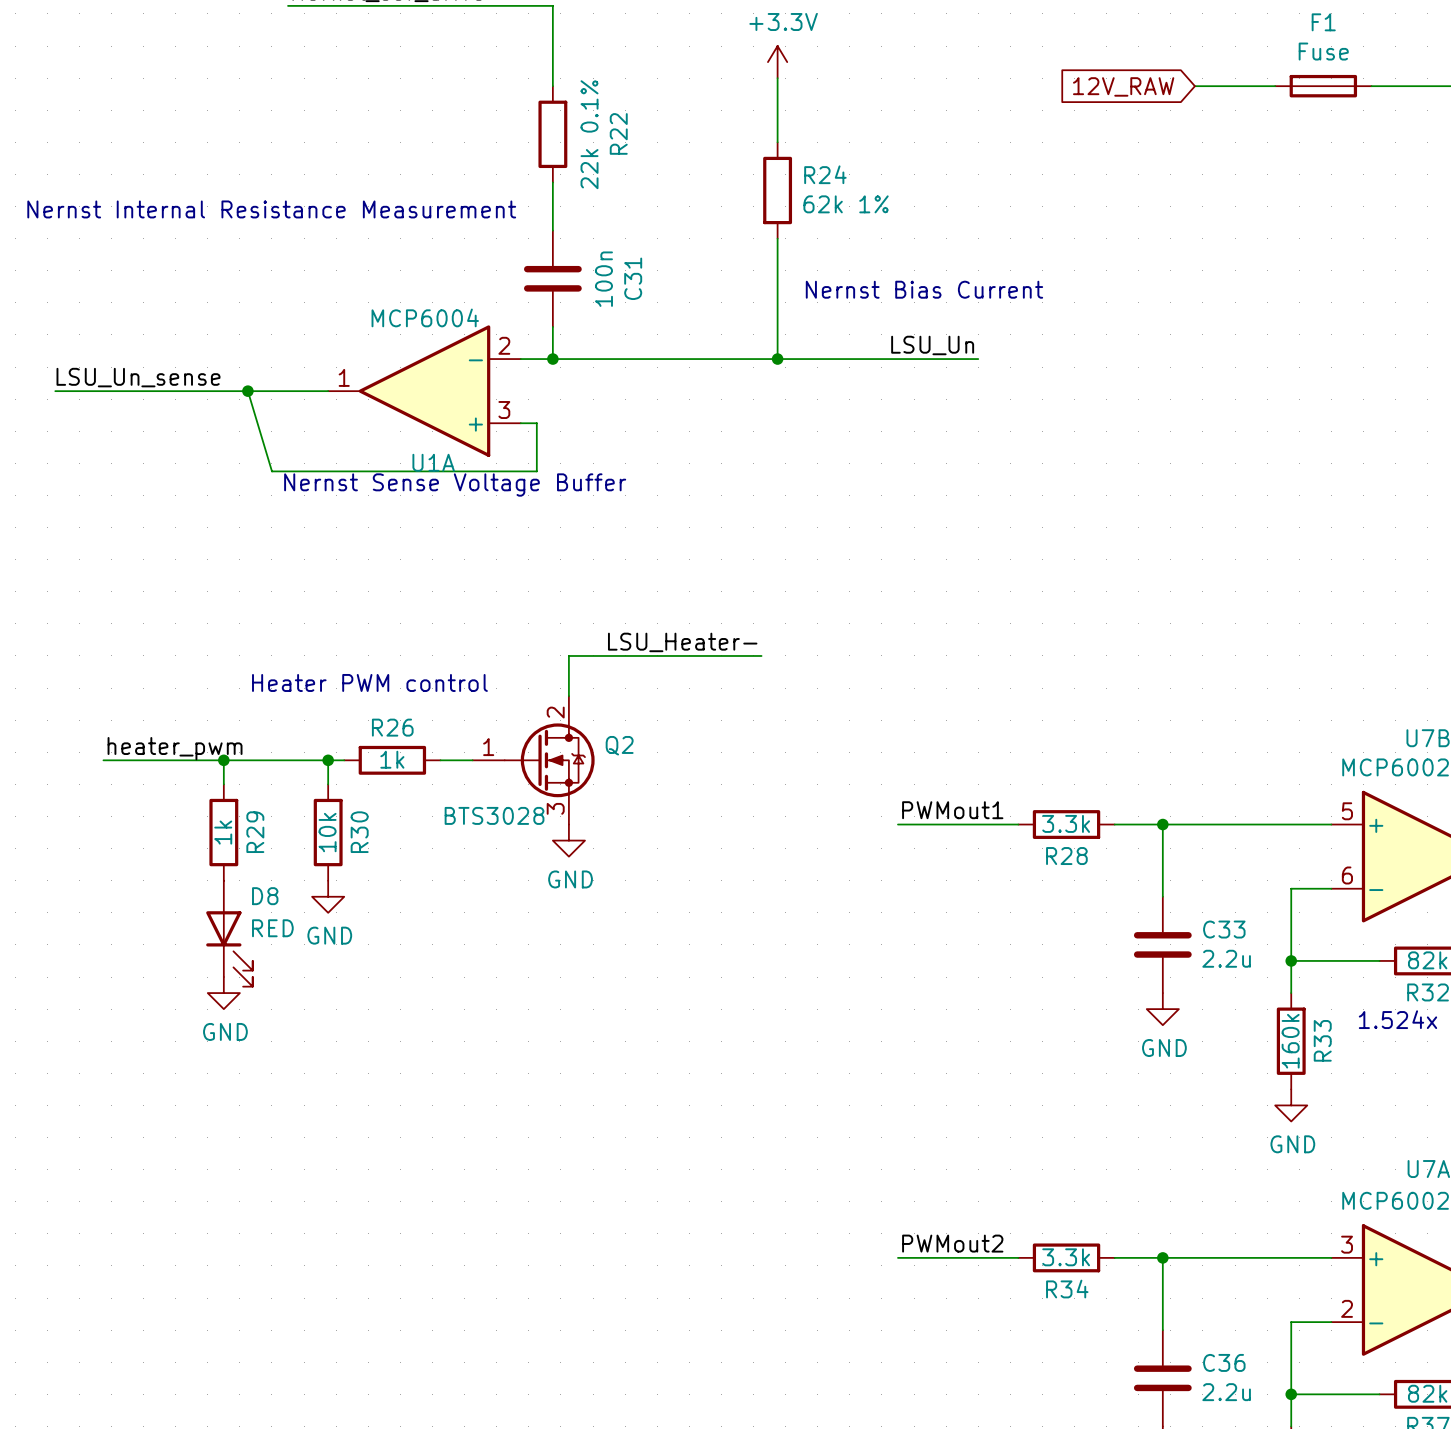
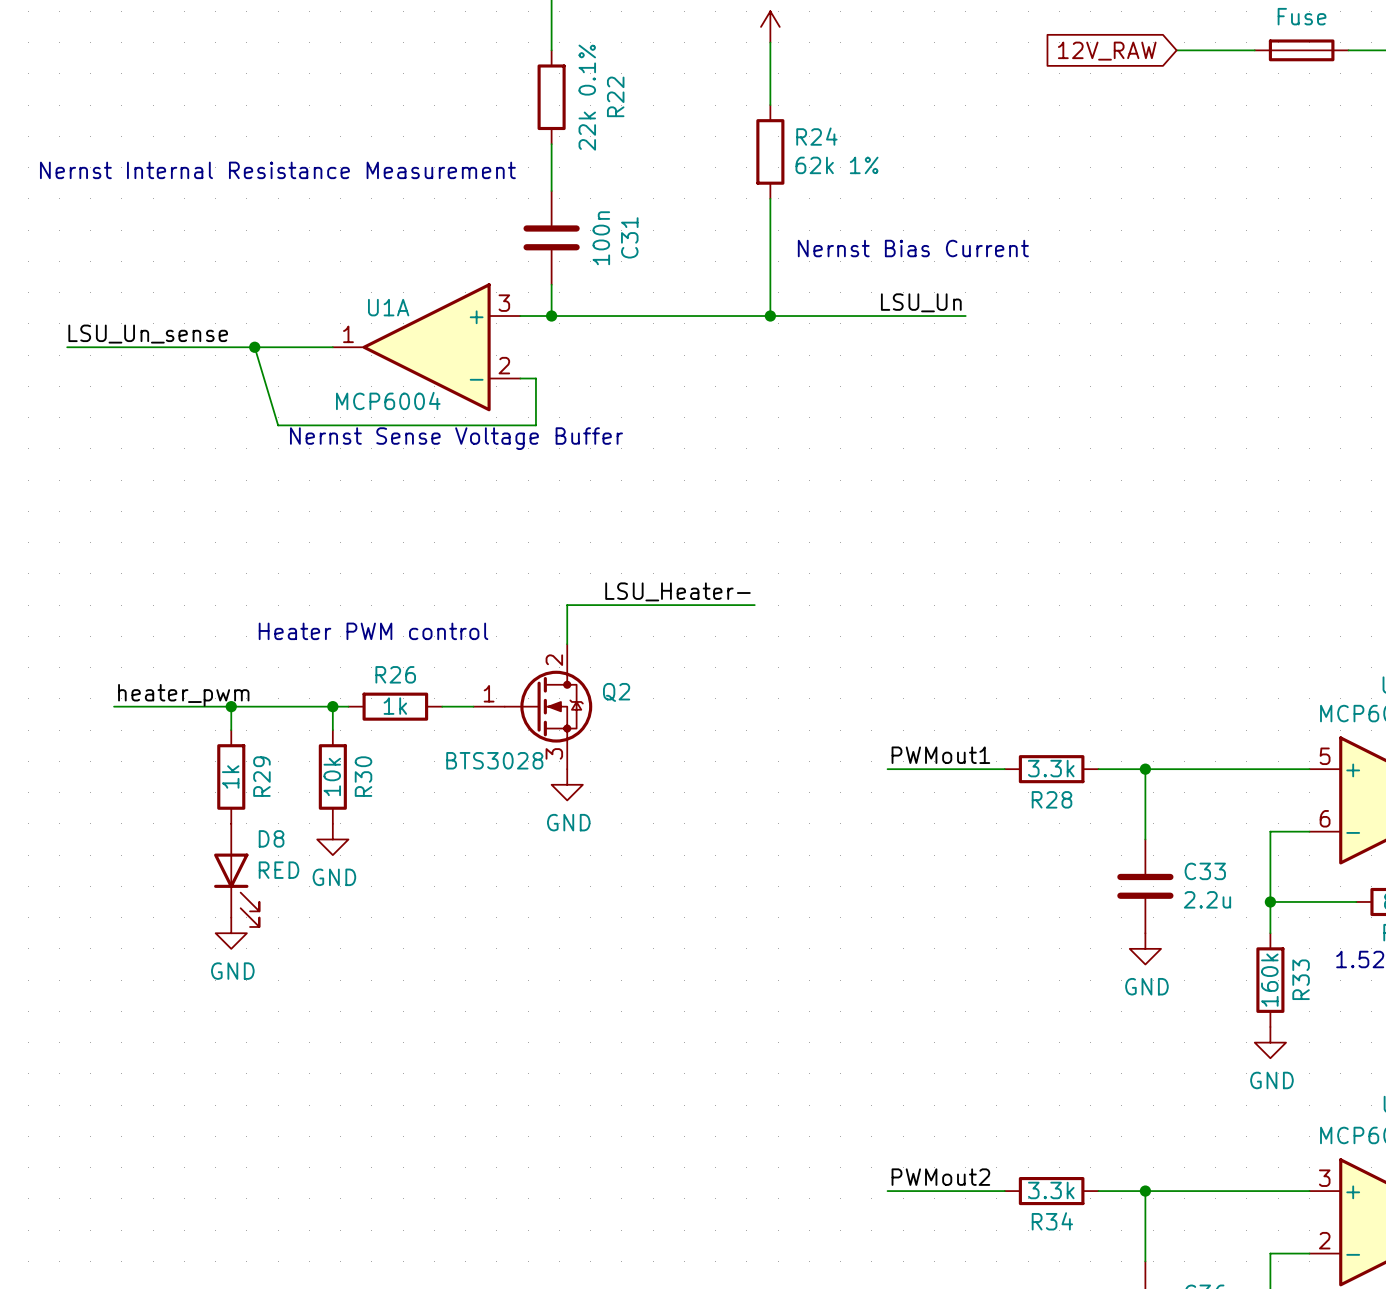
U1A value position: MCP6004 (425, 317) -> MCP6004 (388, 400)
U1A flip: as is (424, 391) -> up-down (426, 347)
U1A name position: U1A (433, 462) -> U1A (388, 307)

